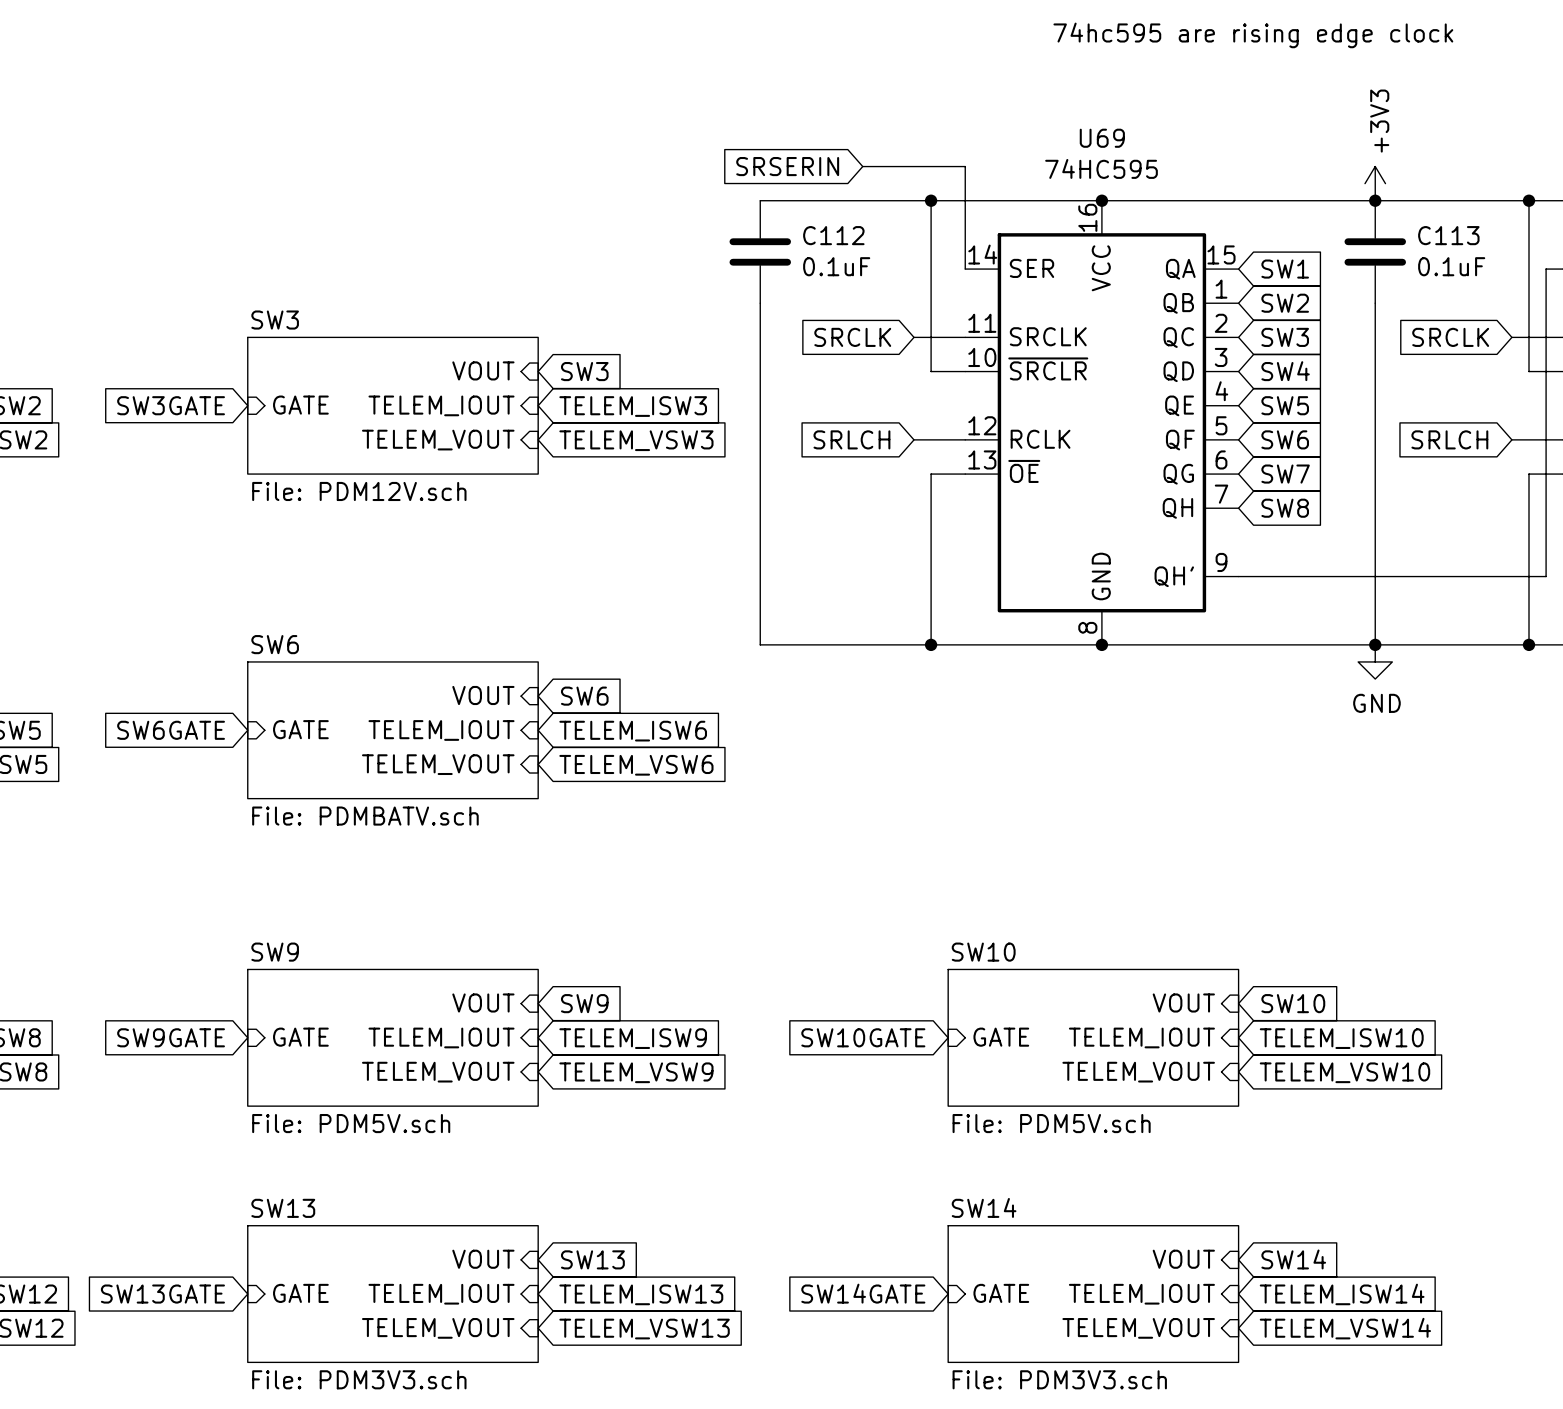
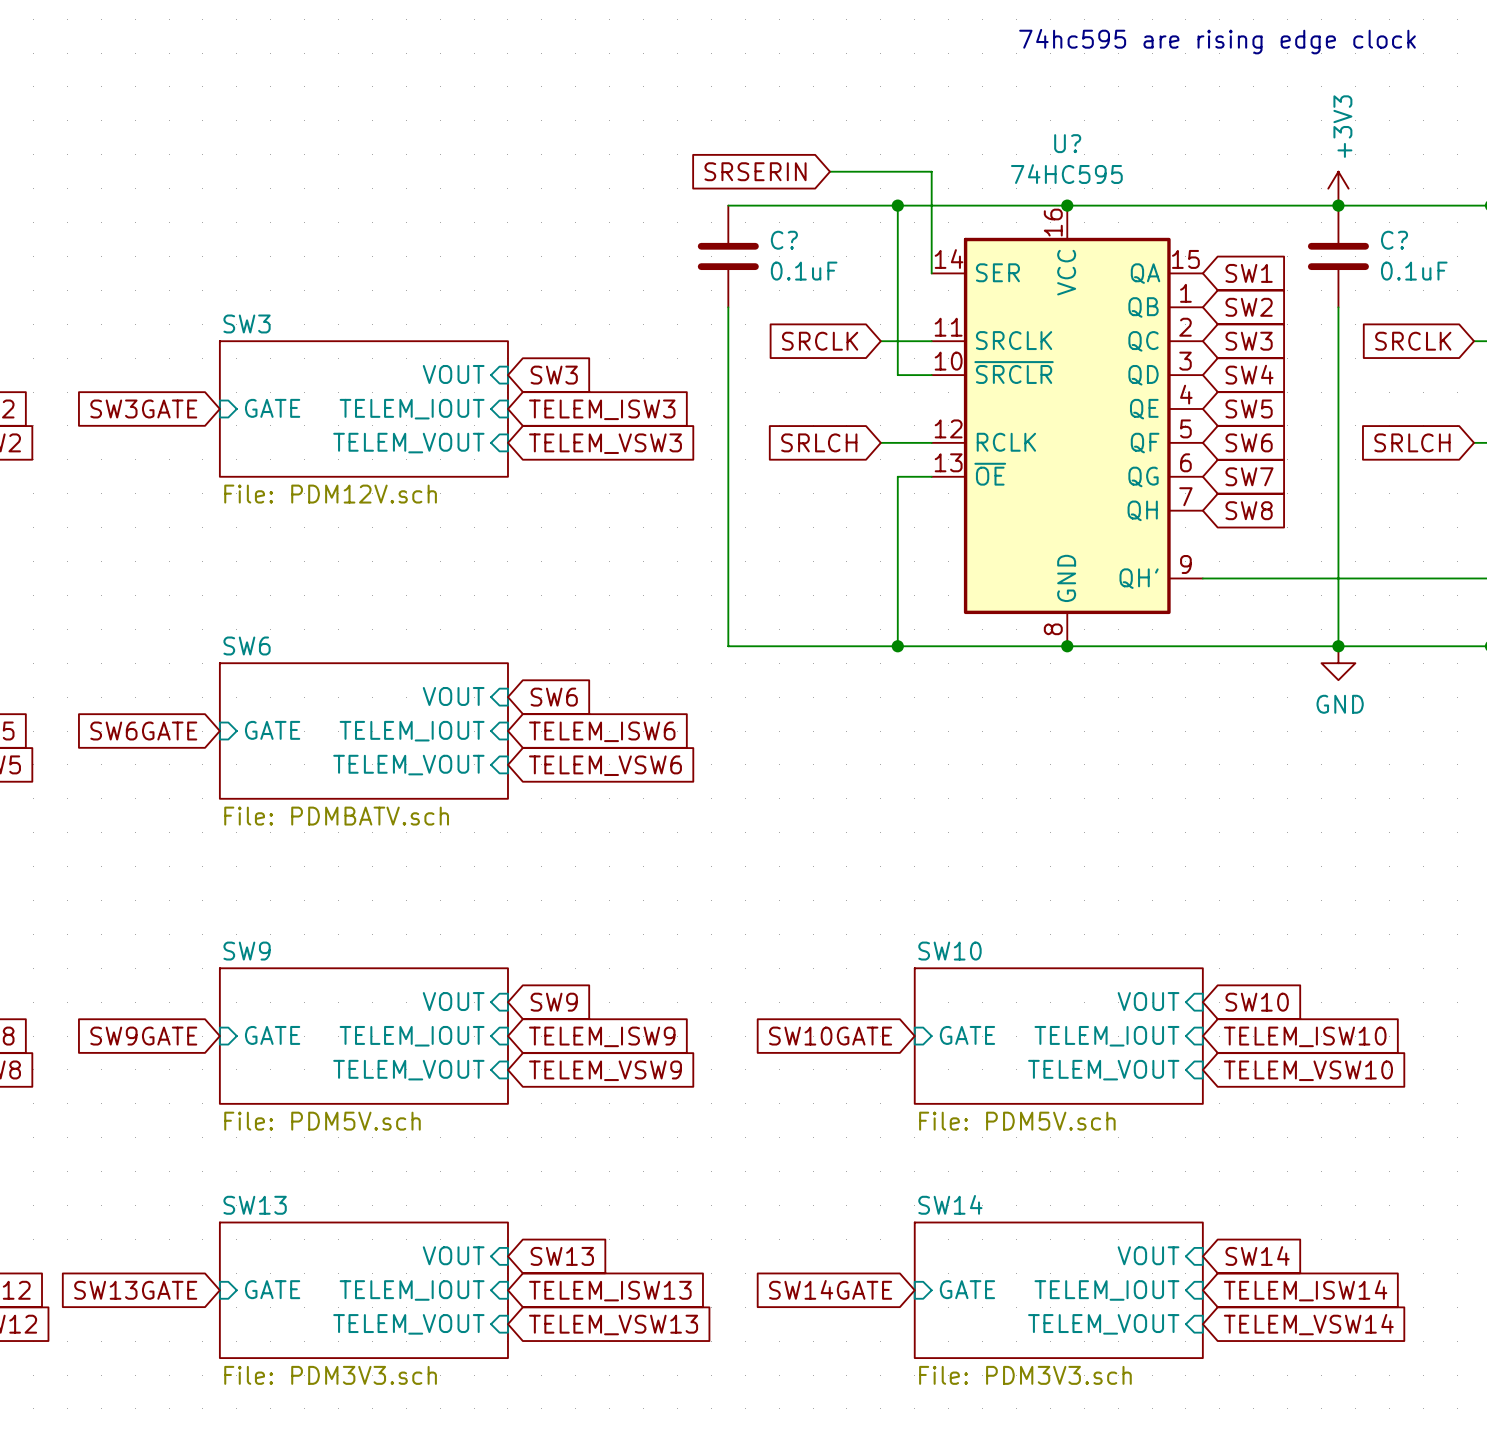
U69 name: U69 (1102, 138) -> U? (1067, 143)
C112 name: C112 (833, 235) -> C? (784, 240)
C113 name: C113 (1448, 235) -> C? (1394, 240)

